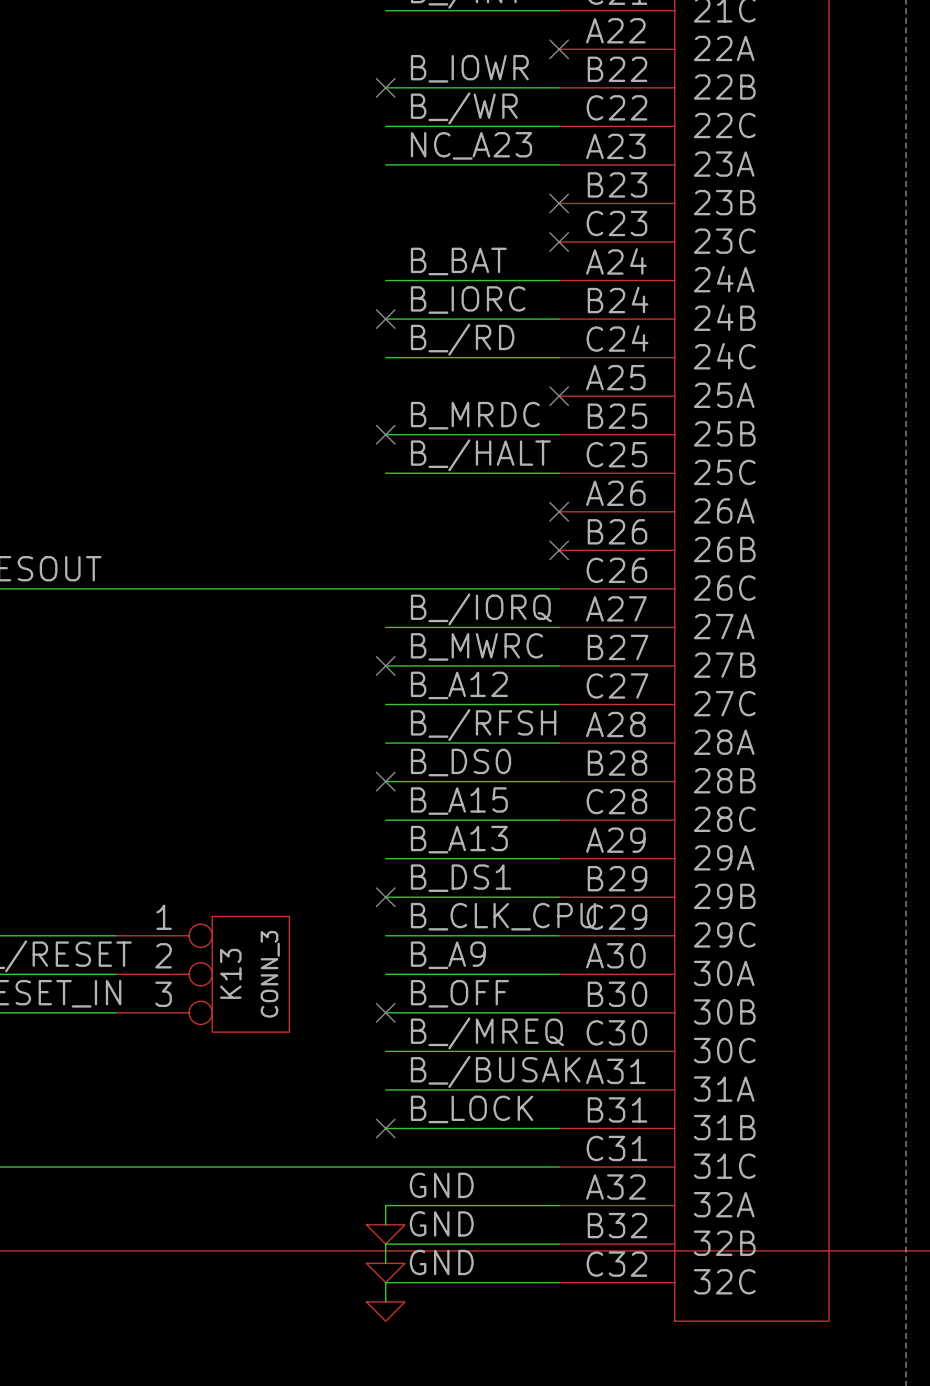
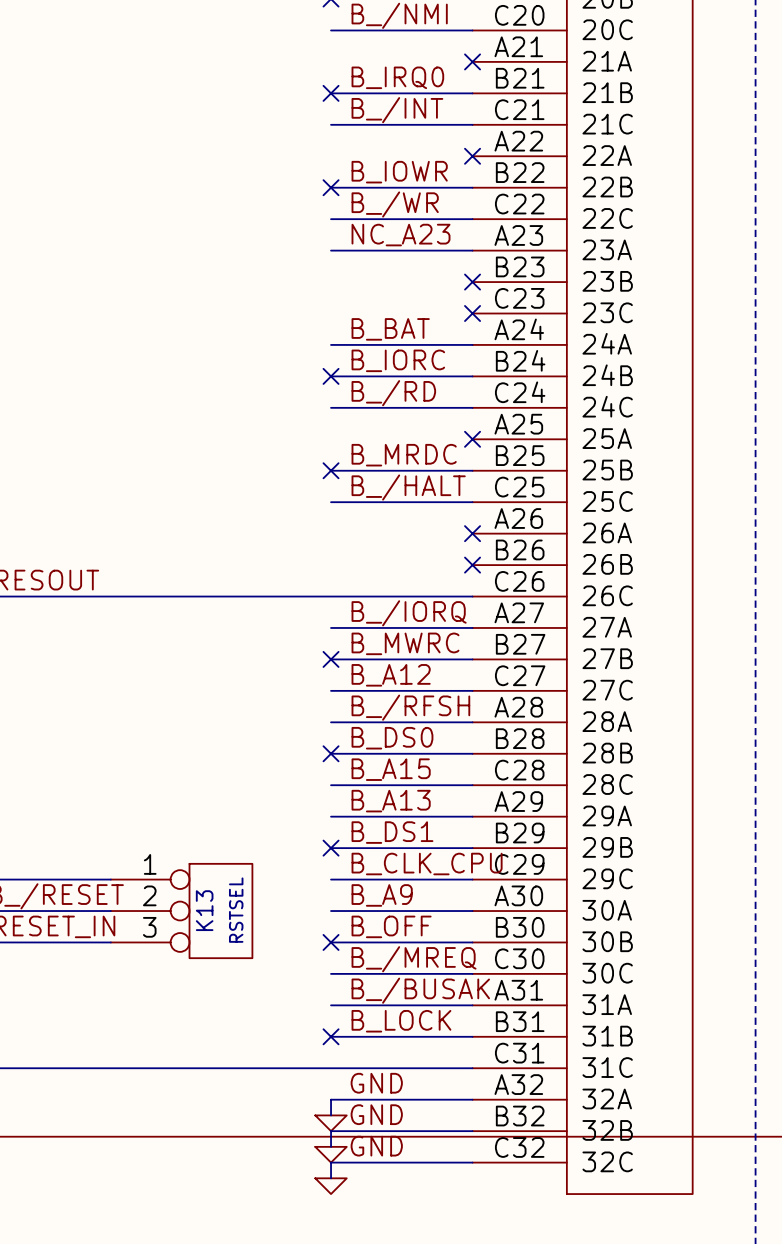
K13 value: CONN_3 (270, 974) -> RSTSEL (236, 910)

